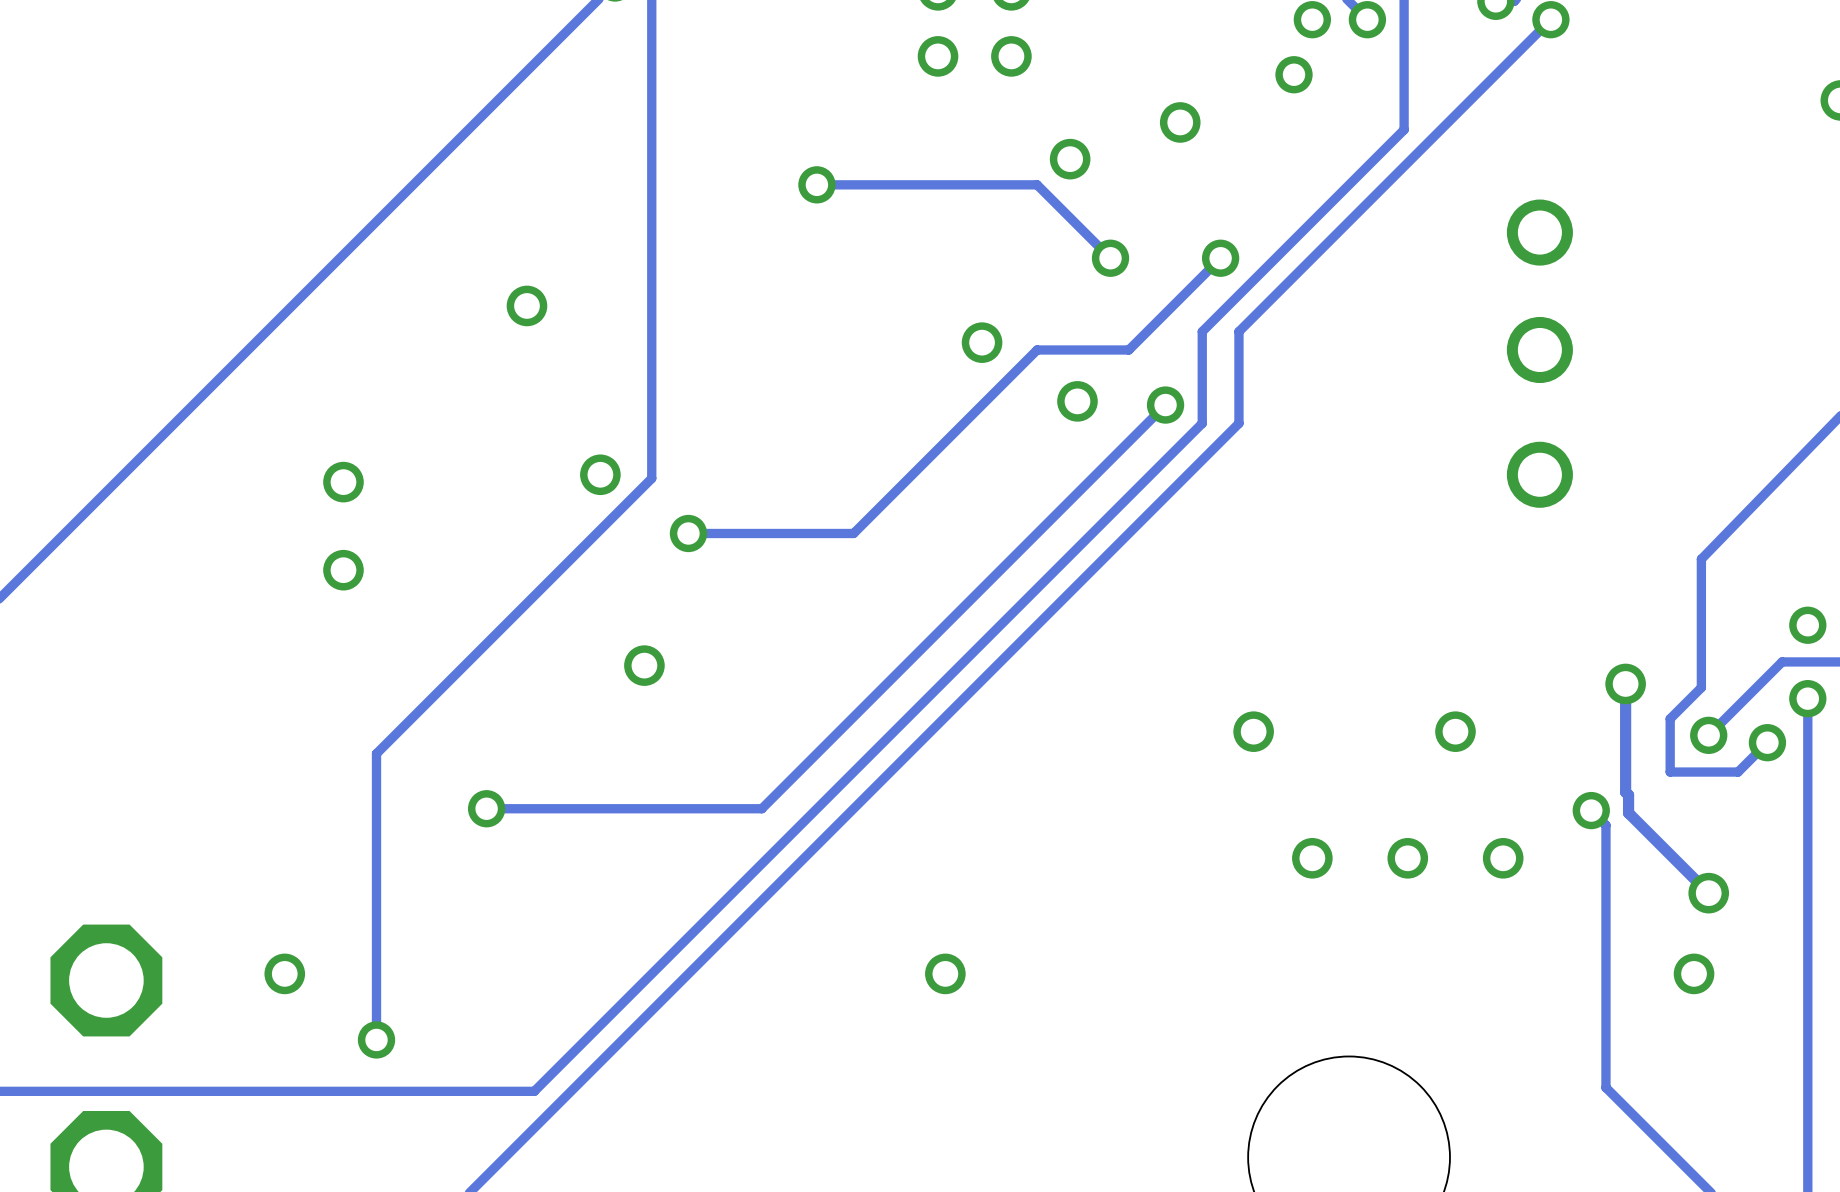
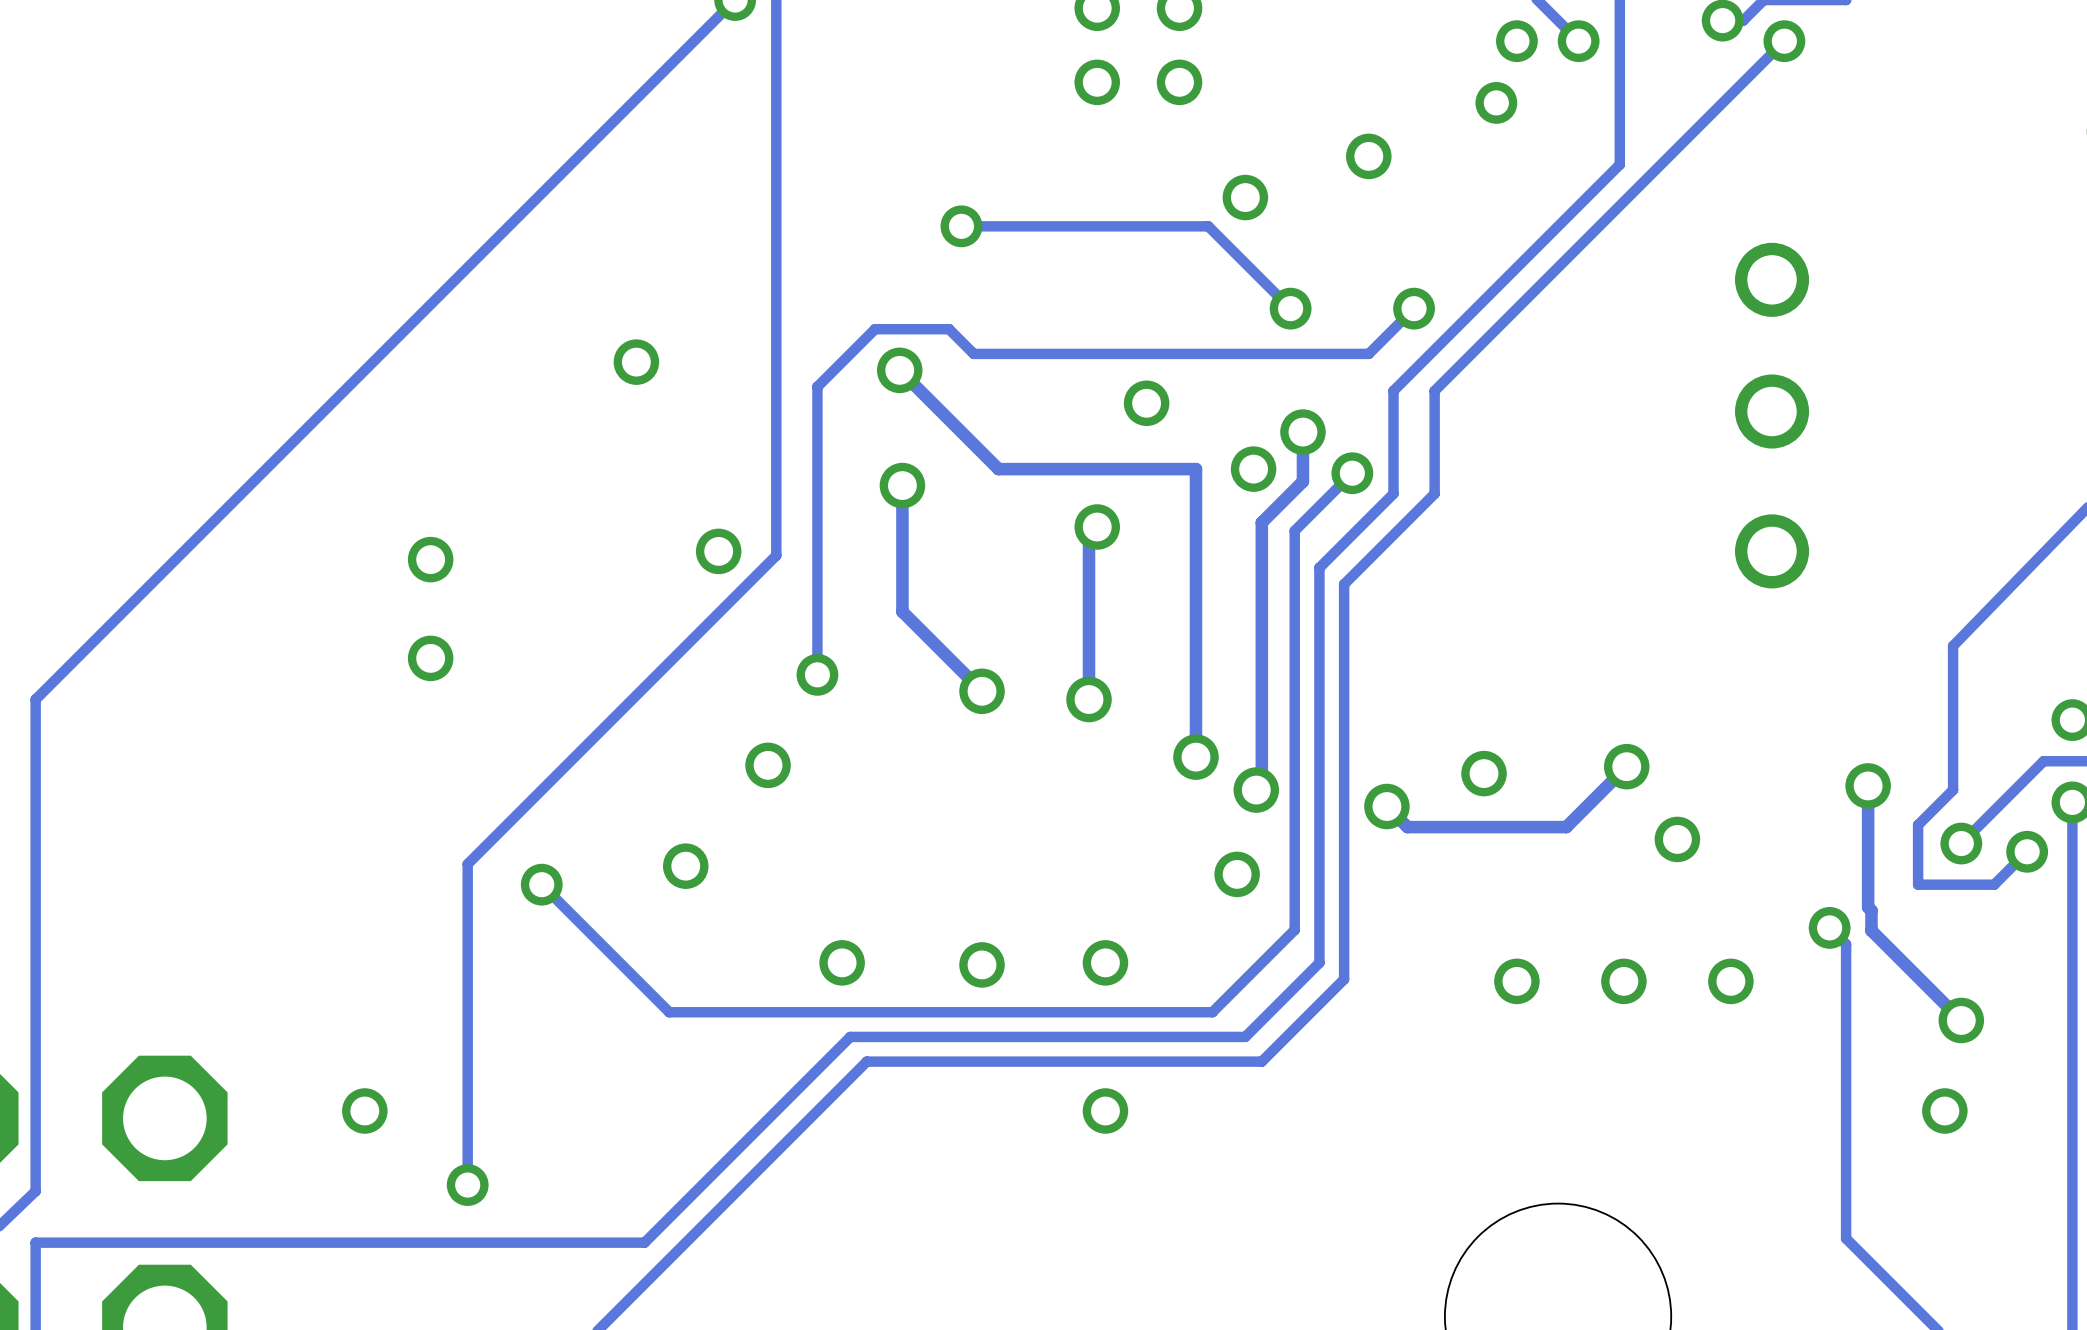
track: (1180, 298) (1128, 349) (1037, 349) (853, 533) (688, 533) -> (1368, 353) (973, 353) (949, 329) (875, 329) (817, 386) (817, 674)
track: none -> (899, 370) (998, 469) (1195, 469) (1195, 757)
via: none -> (899, 370)
track: none -> (1302, 432) (1302, 481) (1261, 522) (1261, 784) (1256, 790)
via: none -> (1302, 432)
track: none -> (902, 485) (902, 611) (982, 691)
via: none -> (902, 485)
track: none -> (1097, 527) (1089, 535) (1089, 699)
via: none -> (1097, 527)
track: (1114, 456) (761, 808) (486, 808) -> (1294, 530) (1294, 929) (1212, 1012) (669, 1012) (541, 884)
track: (1136, 489) (717, 907) -> (1319, 567) (1319, 962) (1245, 1036) (850, 1036)
track: (1158, 504) (732, 929) -> (1344, 584) (1344, 979) (1261, 1061) (866, 1061)
via position: (688, 533) -> (817, 674)
via: none -> (982, 691)
via: none -> (1089, 699)
via: none -> (1195, 757)
track: none -> (1626, 766) (1566, 827) (1407, 827) (1386, 806)
via: none -> (1626, 766)
via: none -> (1484, 773)
via: none -> (1256, 790)
via: none -> (1386, 806)
via: (1253, 731) -> none
via: none -> (685, 866)
via: none -> (1237, 874)
via position: (486, 808) -> (541, 884)
via: none -> (842, 962)
via: none -> (1105, 962)
via: none -> (982, 964)

